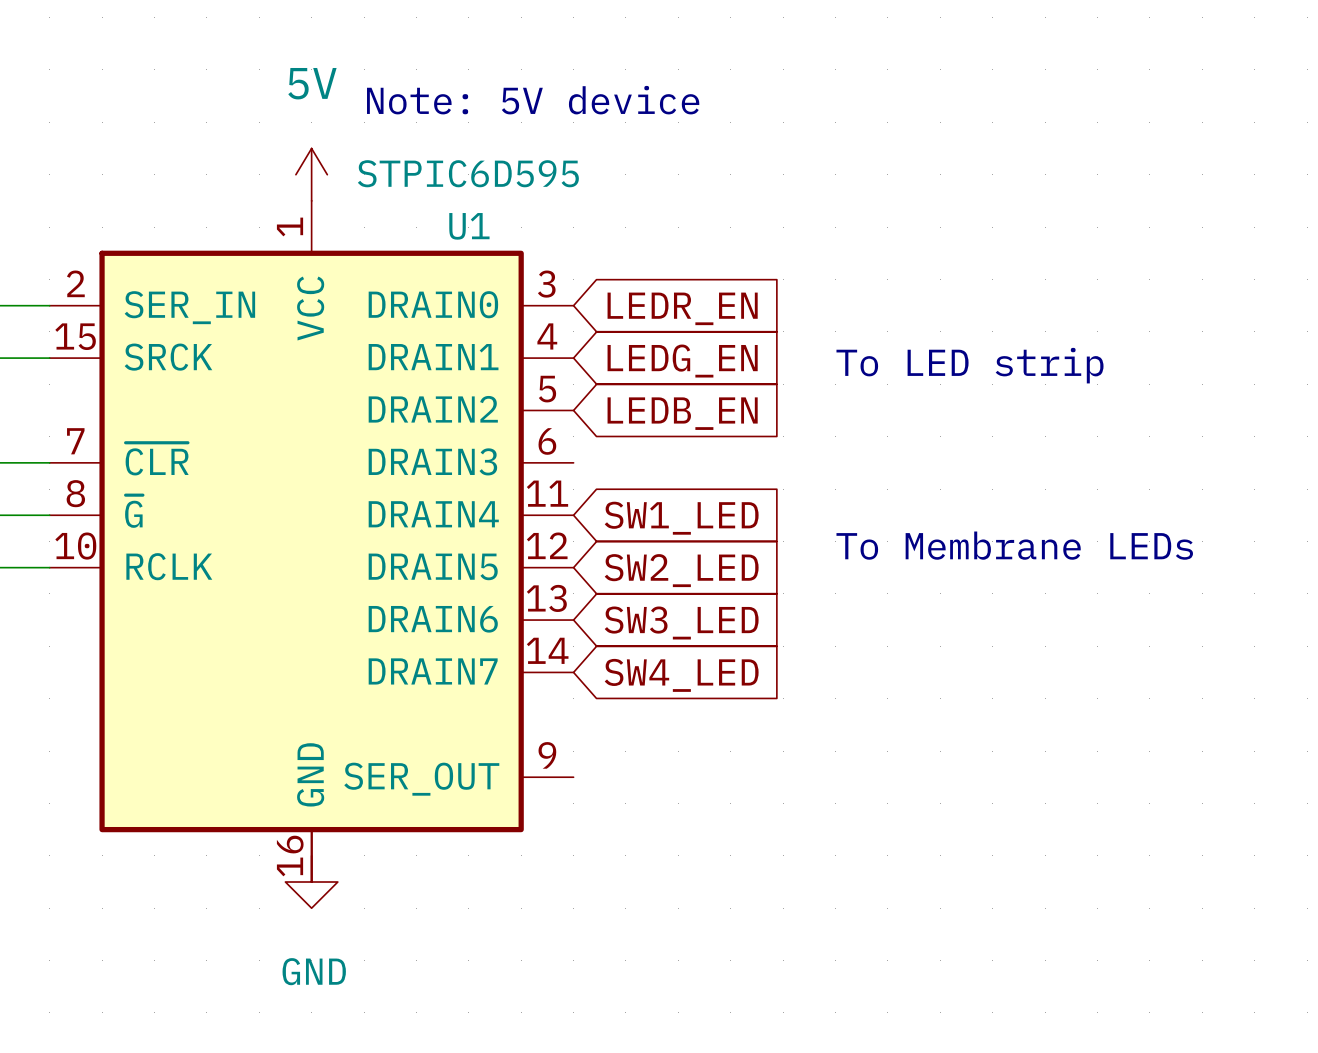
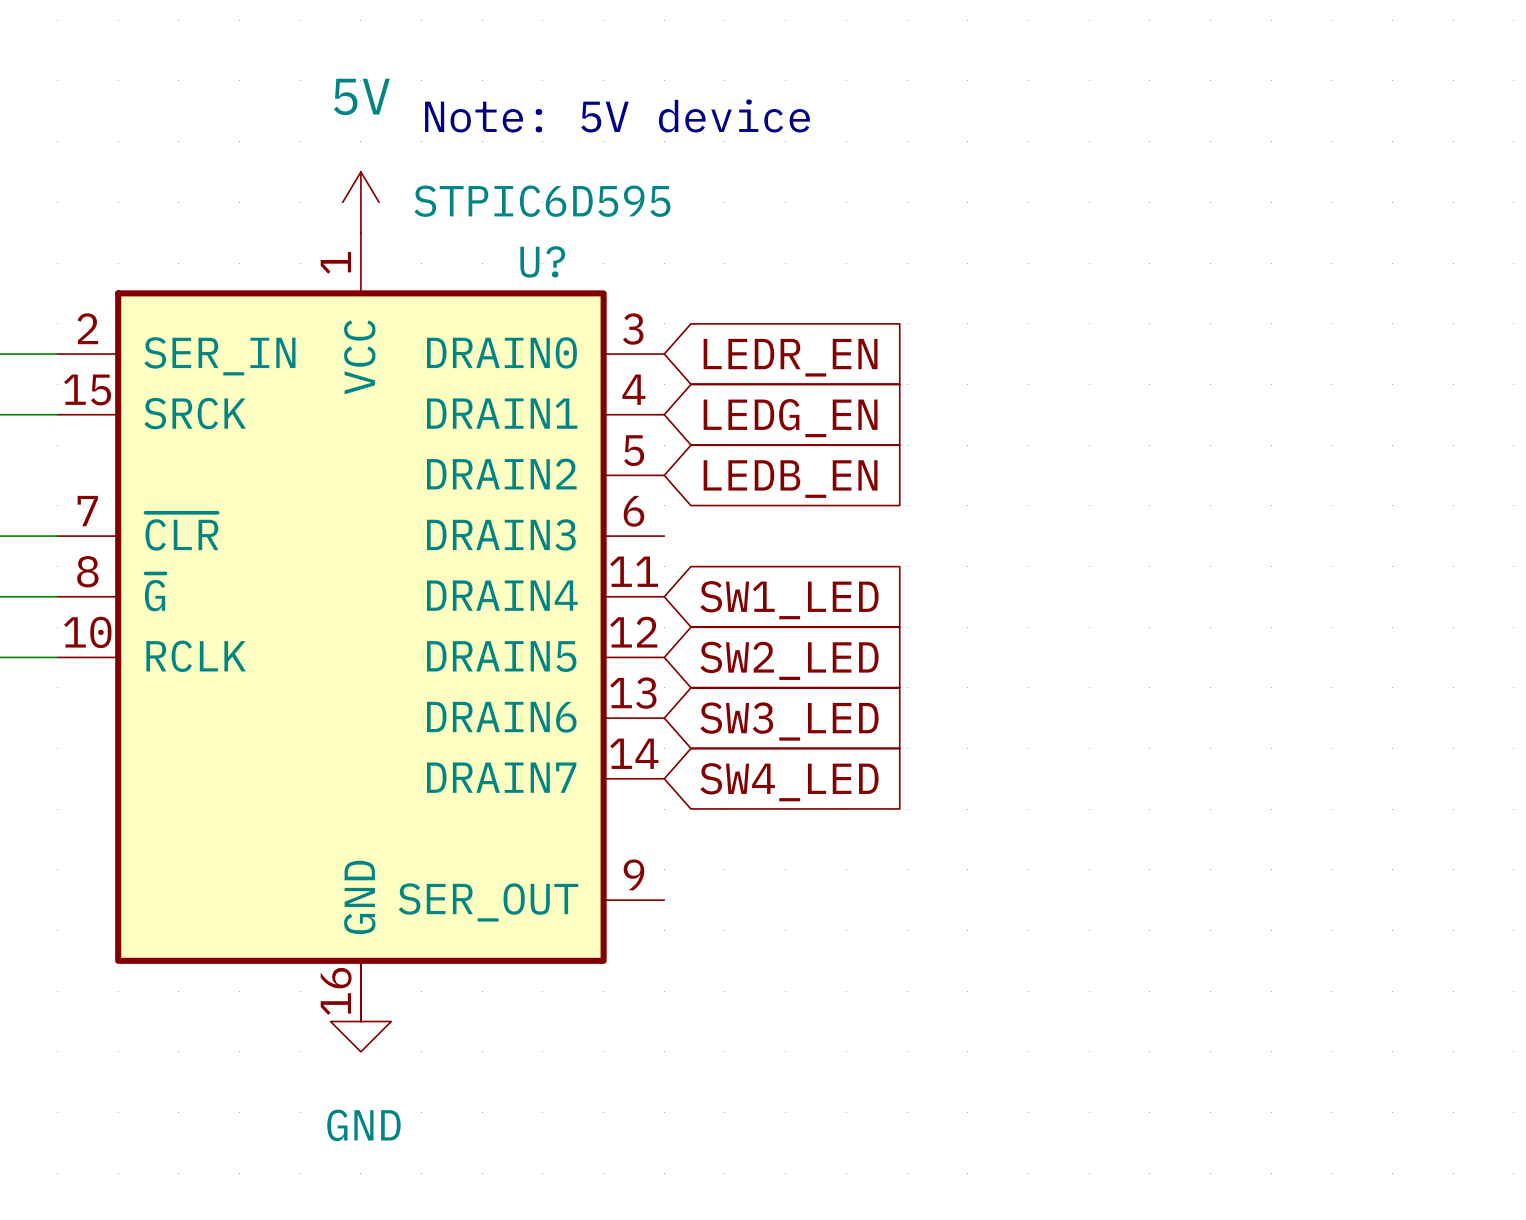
U1 name: U1 (469, 226) -> U? (542, 261)
text: To LED strip (969, 365) -> none
text: To Membrane LEDs (1014, 545) -> none

